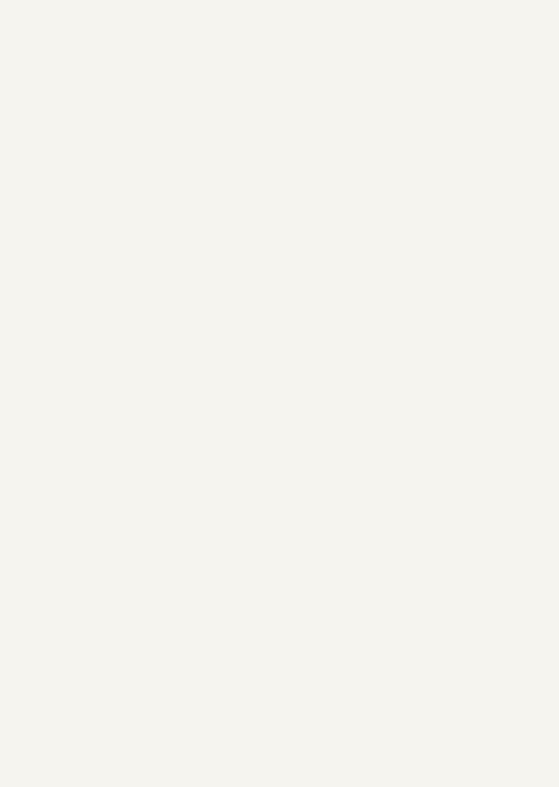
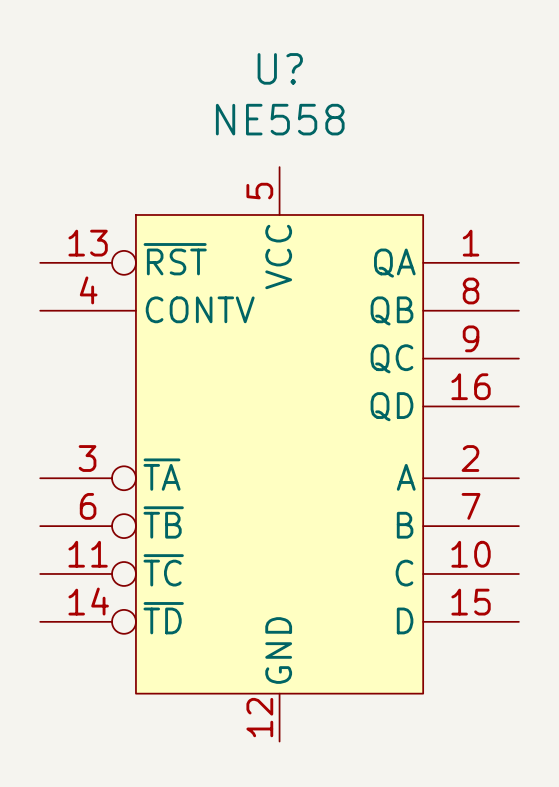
U?: none -> NE558 (279, 454)

